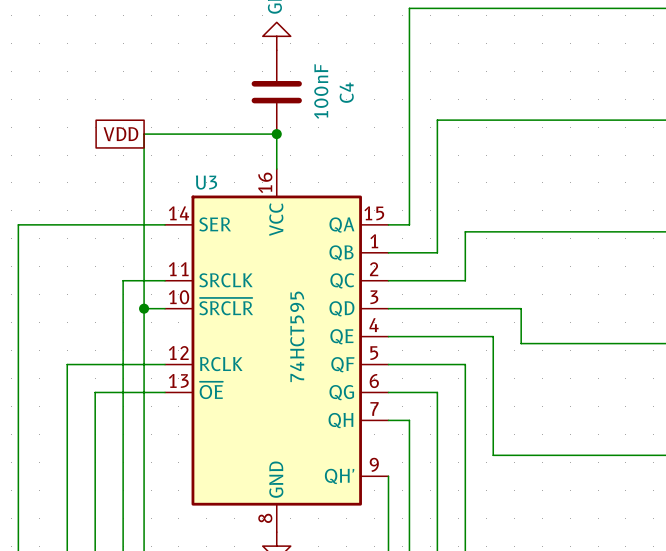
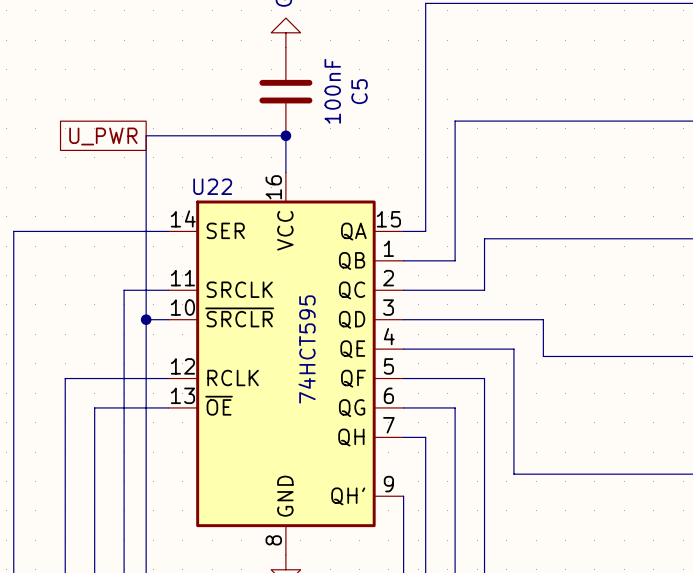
C4 name: C4 (346, 92) -> C5 (359, 91)
global label: VDD (120, 134) -> U_PWR (103, 136)
U3 name: U3 (206, 182) -> U22 (212, 186)

